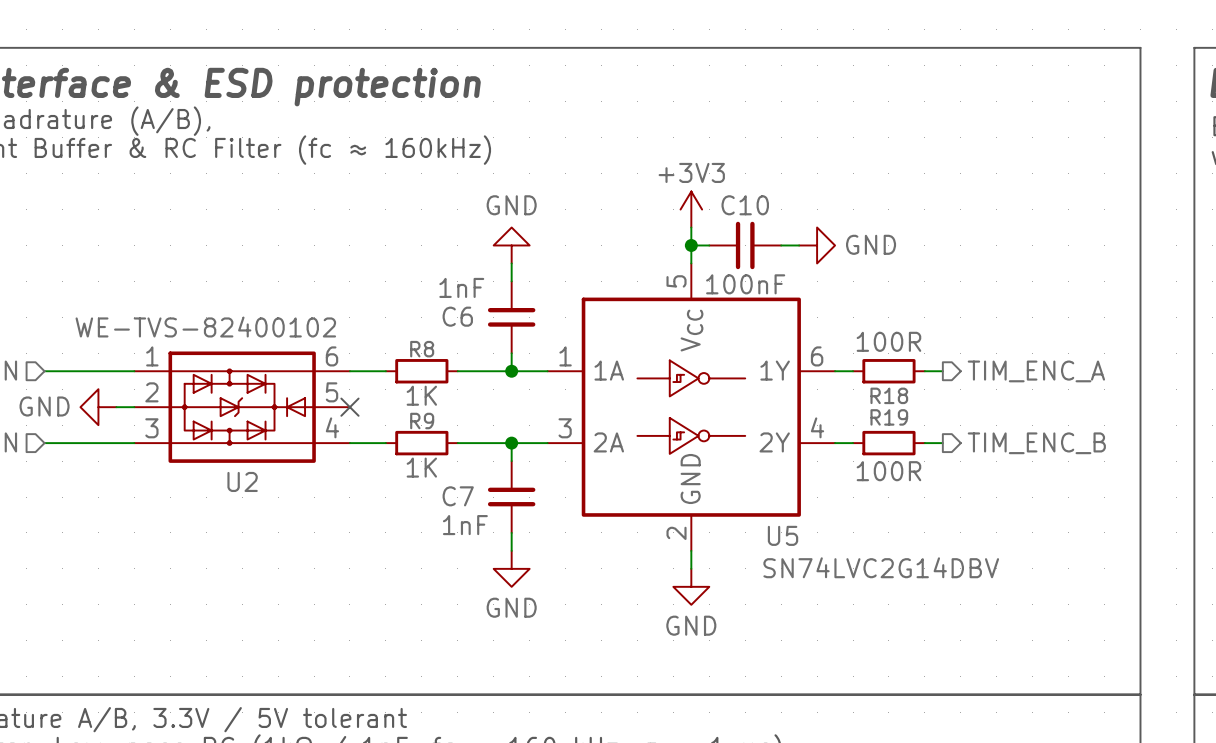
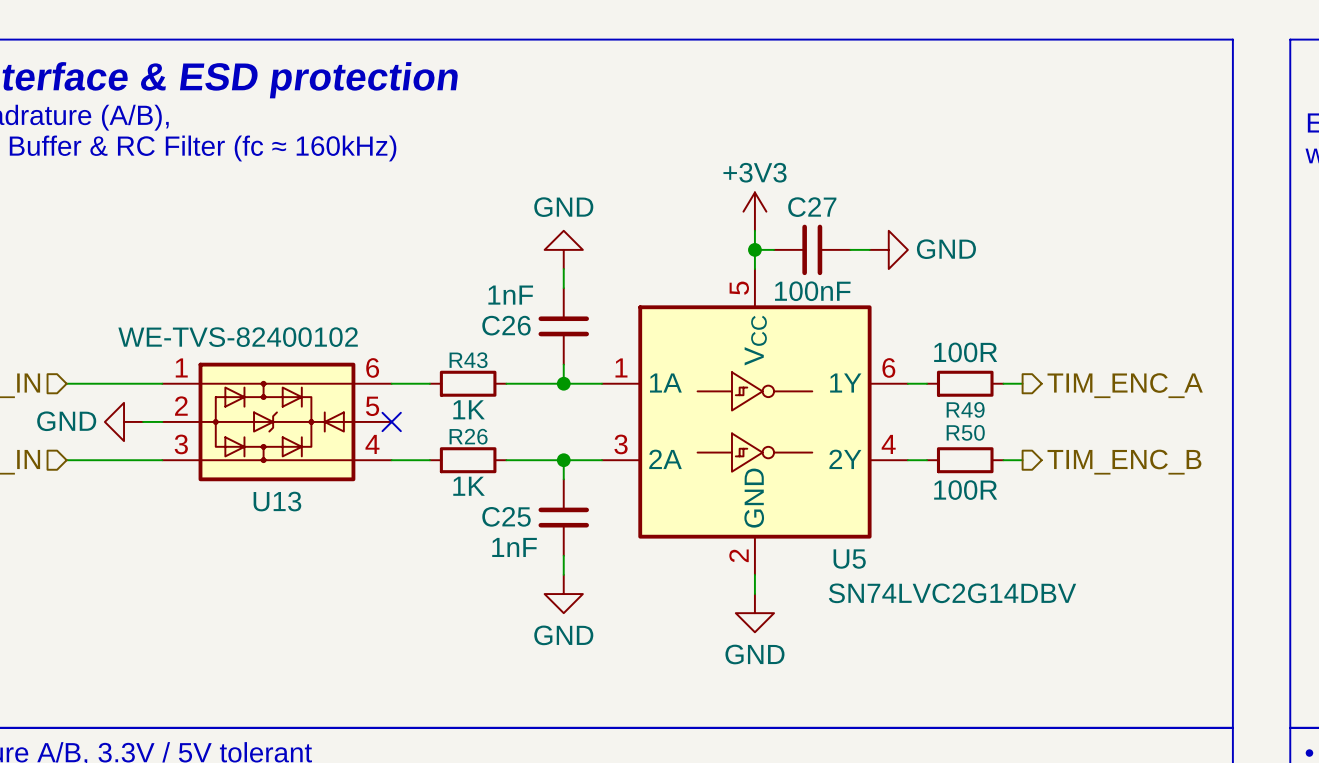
C10 name: C10 (745, 205) -> C27 (812, 207)
C6 name: C6 (457, 316) -> C26 (506, 325)
R8 name: R8 (422, 349) -> R43 (468, 360)
R18 name: R18 (889, 395) -> R49 (965, 409)
R19 name: R19 (889, 417) -> R50 (965, 432)
R9 name: R9 (422, 421) -> R26 (468, 436)
U2 name: U2 (242, 481) -> U13 (277, 501)
C7 name: C7 (458, 496) -> C25 (506, 516)

